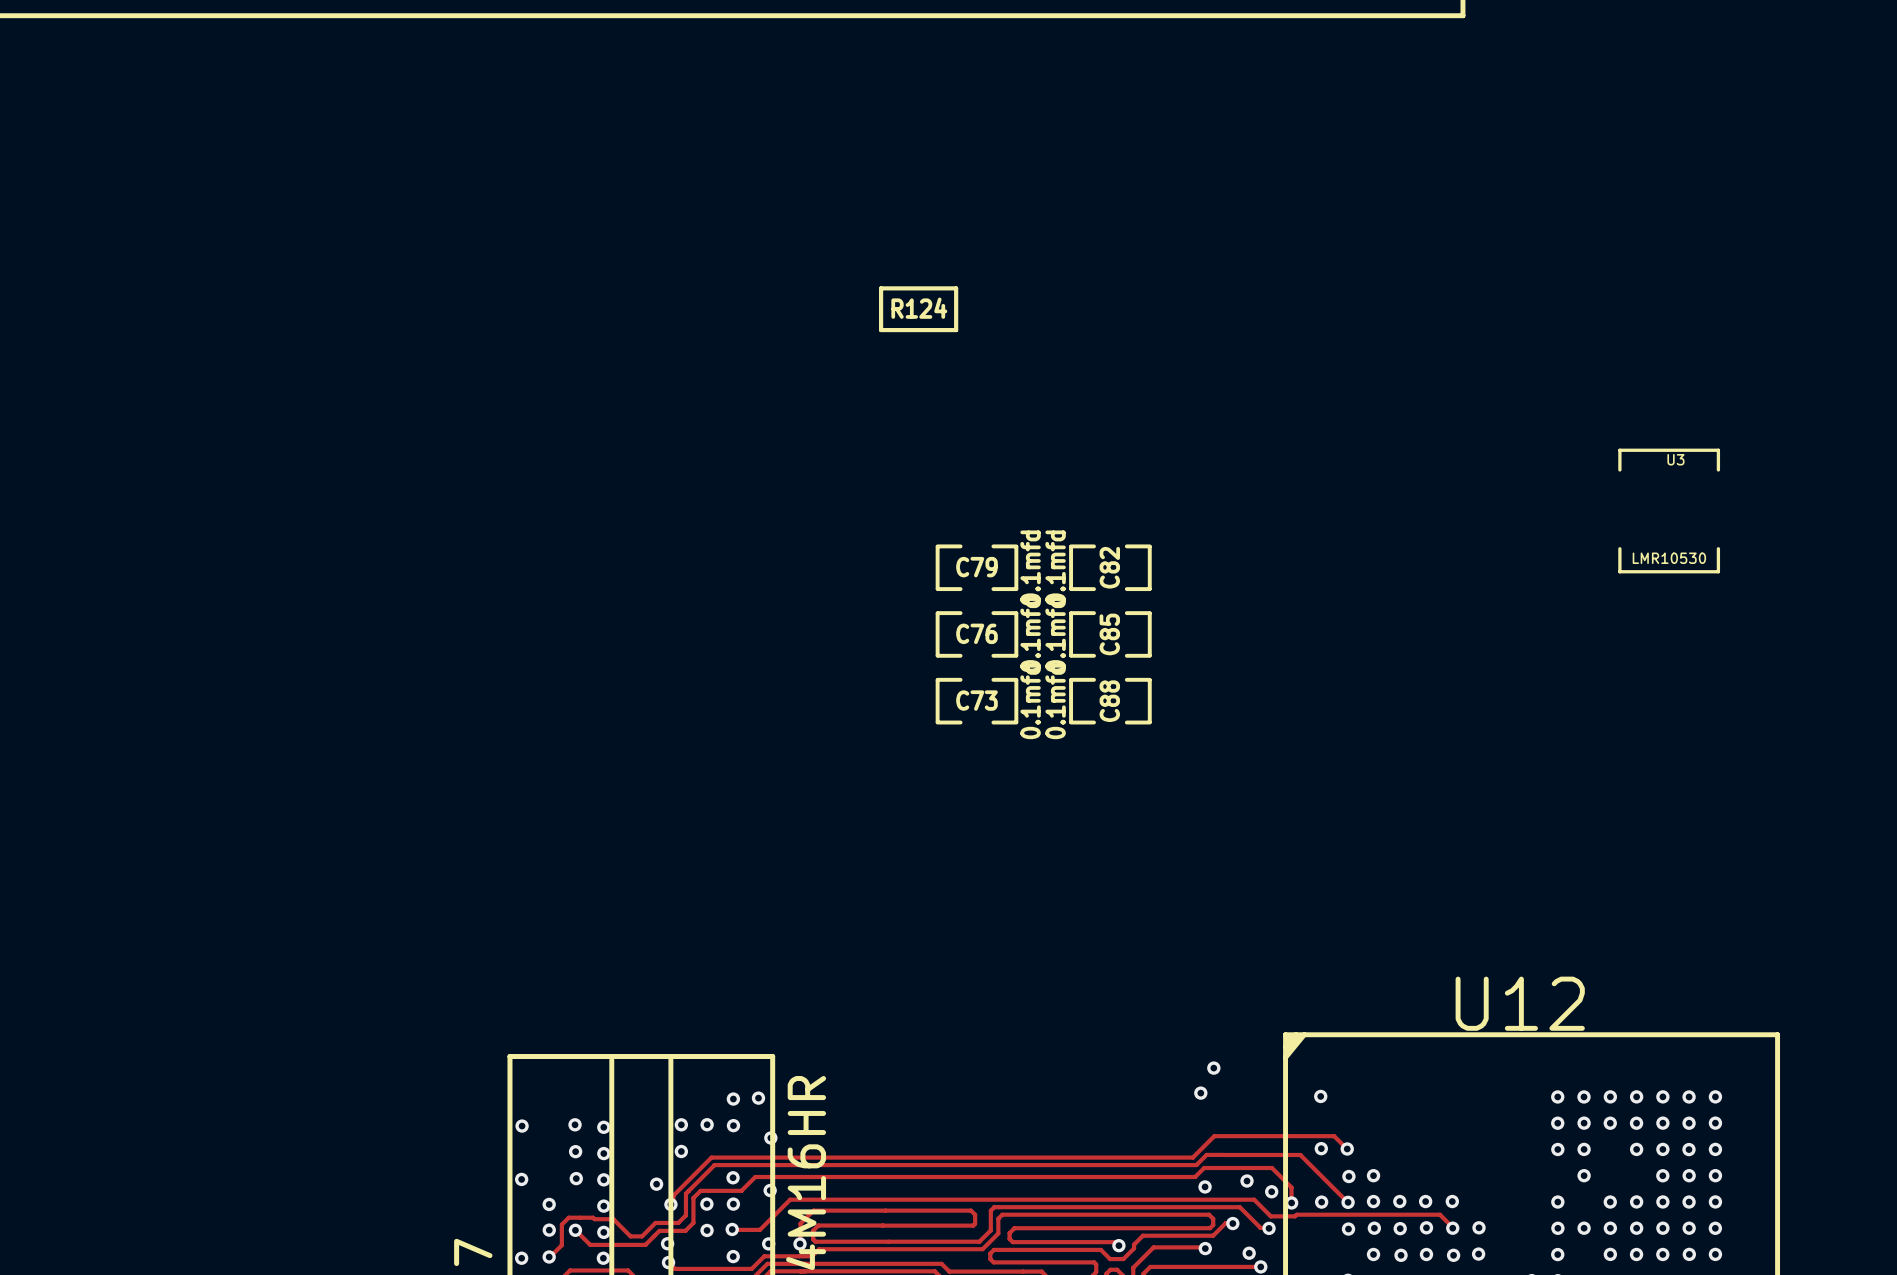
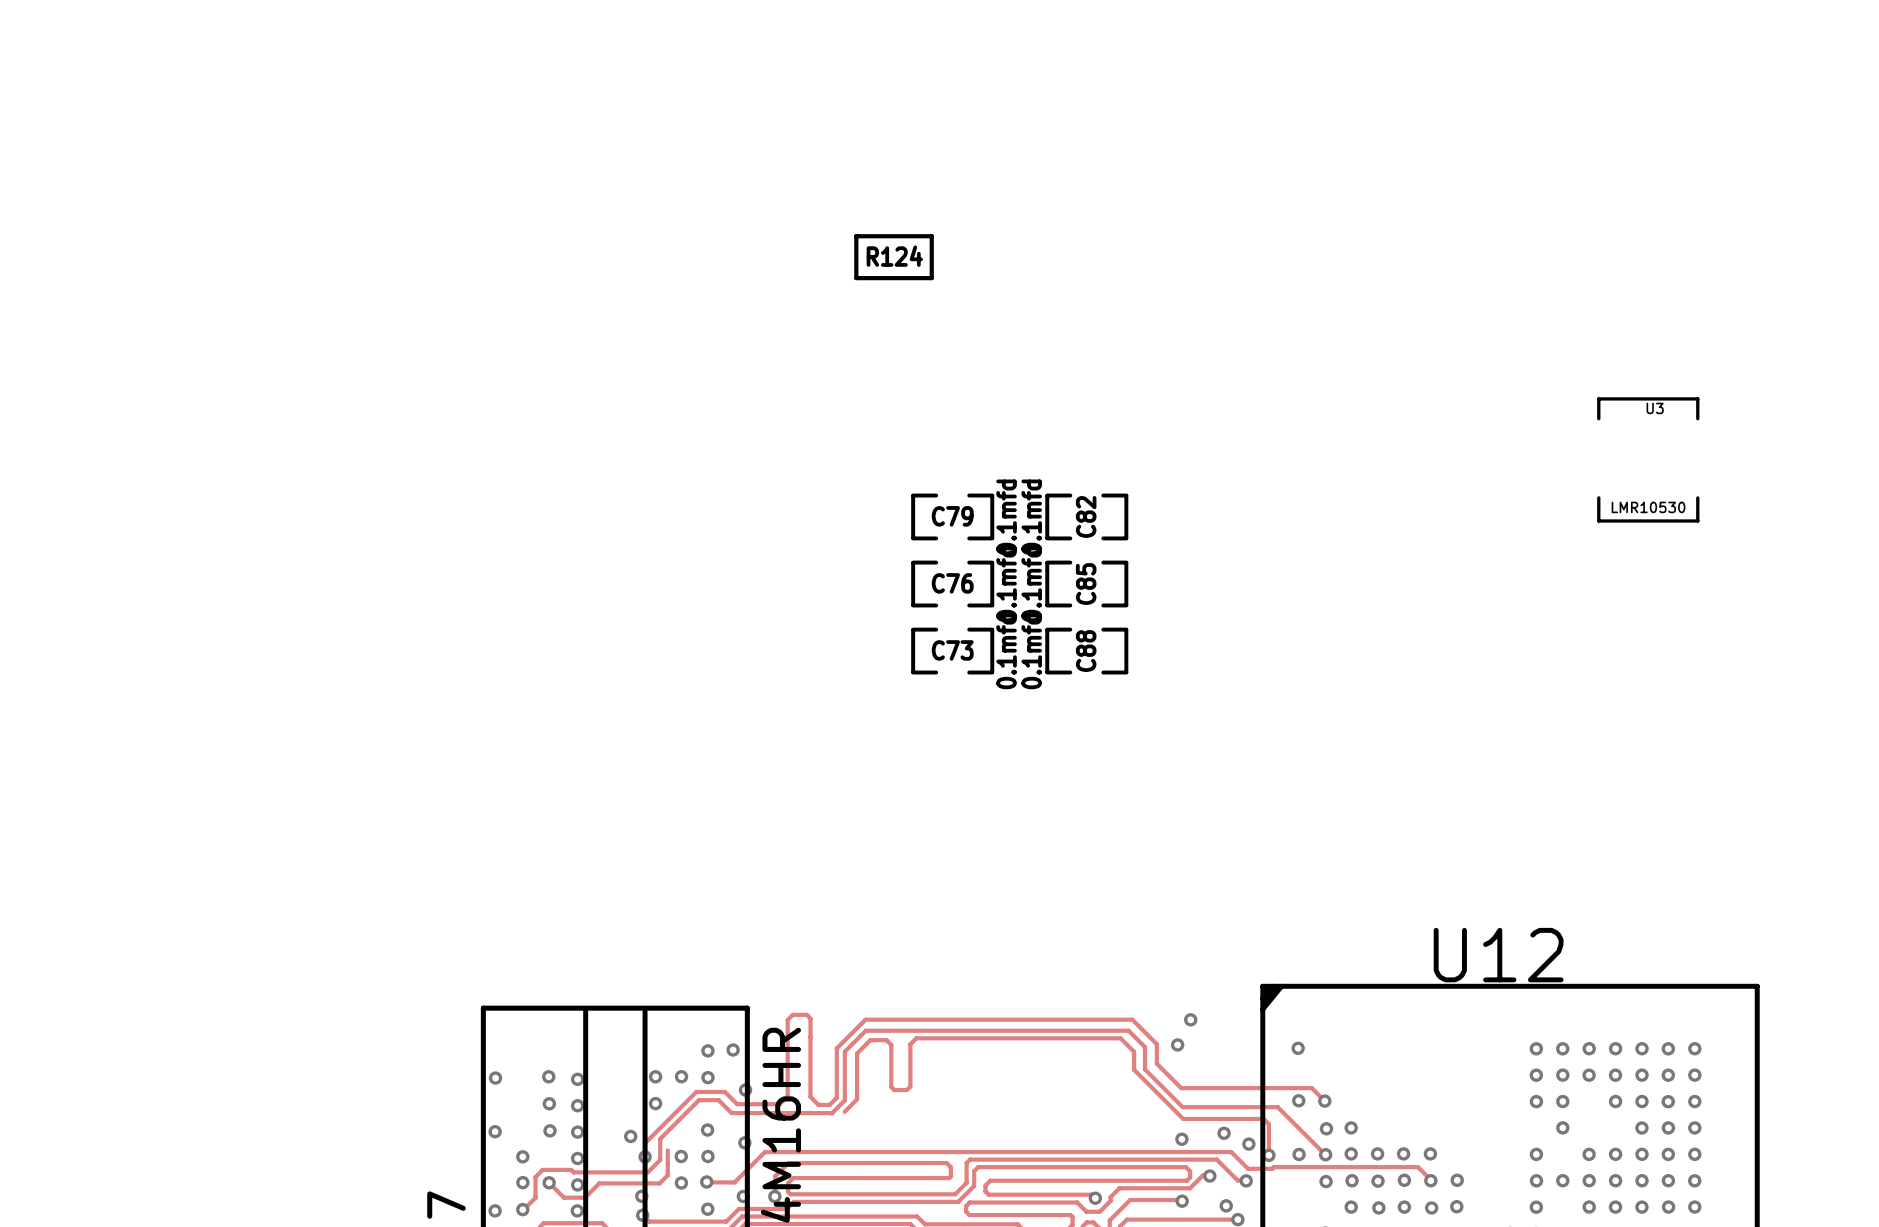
track: (1334, 1136) (1214, 1136) (1192, 1157) (711, 1157) (673, 1195) (673, 1202) (670, 1204) -> (1311, 1088) (1181, 1088) (1156, 1063) (1156, 1044) (1132, 1019) (865, 1019) (836, 1048) (836, 1097) (829, 1104) (818, 1104) (810, 1096) (810, 1018) (806, 1014) (792, 1014) (787, 1020) (787, 1096) (779, 1104) (737, 1104) (724, 1091) (696, 1091) (645, 1143) (645, 1156)
track: (1206, 1154) (1196, 1165) (714, 1165) (685, 1193) -> (1183, 1107) (1144, 1069) (1144, 1047) (1128, 1030) (865, 1030) (844, 1051) (844, 1100) (831, 1113)
track: none -> (832, 1113) (731, 1113) (718, 1100) (699, 1100) (660, 1138) (660, 1146)
track: (1291, 1187) (1272, 1168) (1204, 1168) (1195, 1177) (755, 1177) (741, 1190) (700, 1190) (693, 1198) -> (1268, 1139) (1268, 1124) (1263, 1118) (1183, 1118) (1134, 1069) (1134, 1051) (1120, 1038) (916, 1038) (910, 1044) (910, 1086) (906, 1090) (894, 1089) (891, 1087) (891, 1044) (886, 1040) (870, 1040) (857, 1053) (857, 1099) (844, 1111)
track: (685, 1207) (685, 1215) (678, 1222) (655, 1222) (642, 1236) (630, 1236) (613, 1219) (568, 1217) -> (660, 1159) (647, 1172) (573, 1172) (571, 1169) (542, 1169)
track: (659, 1230) (645, 1244) (590, 1244) -> (633, 1183) (599, 1183) (585, 1197) (564, 1197)

